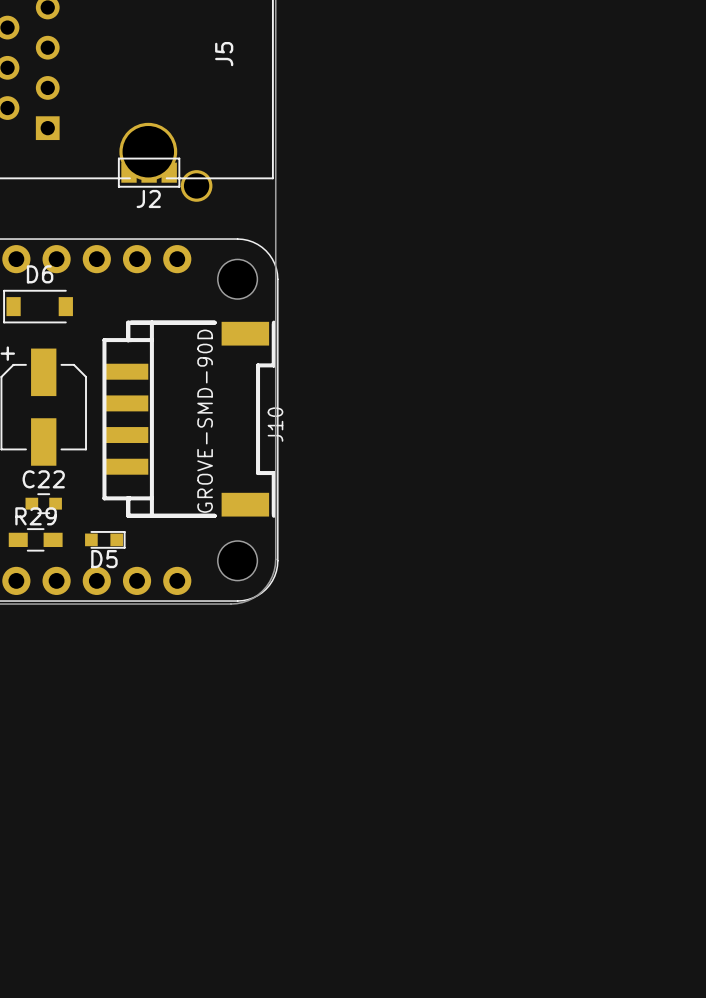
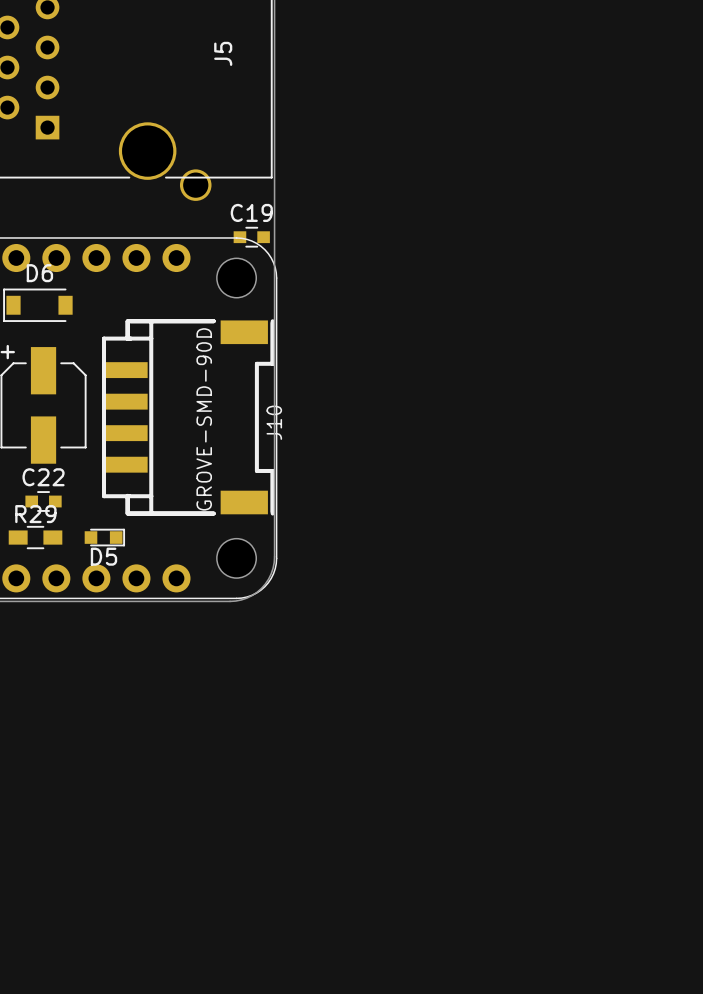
J2: (149, 172) -> none
C19: none -> (251, 237)

